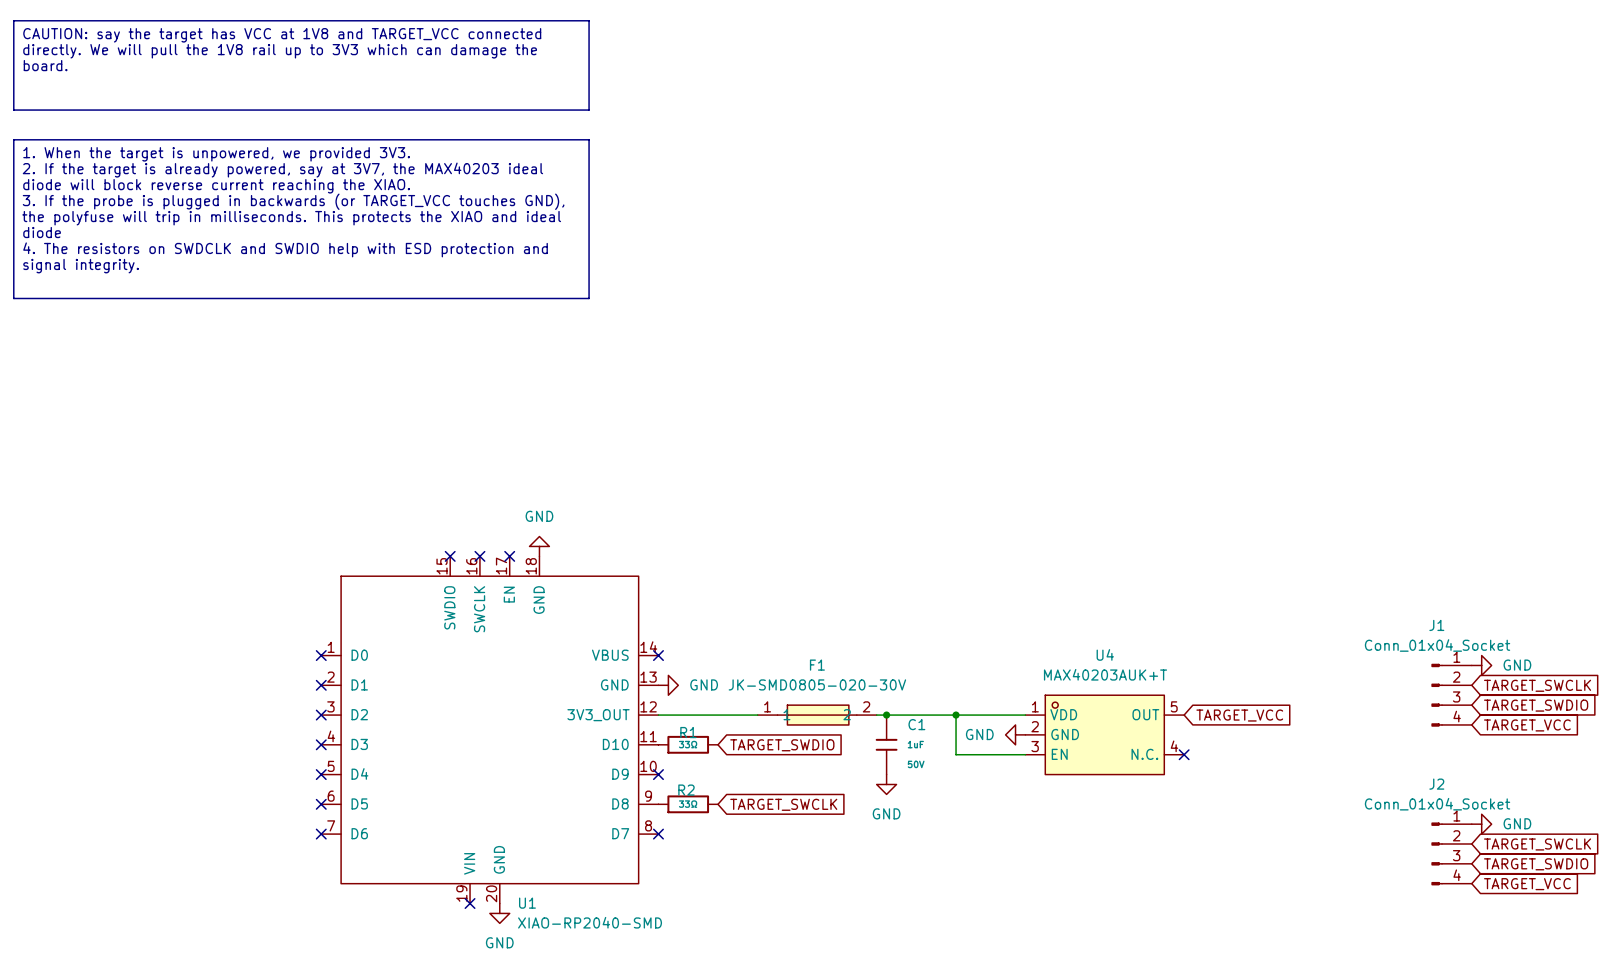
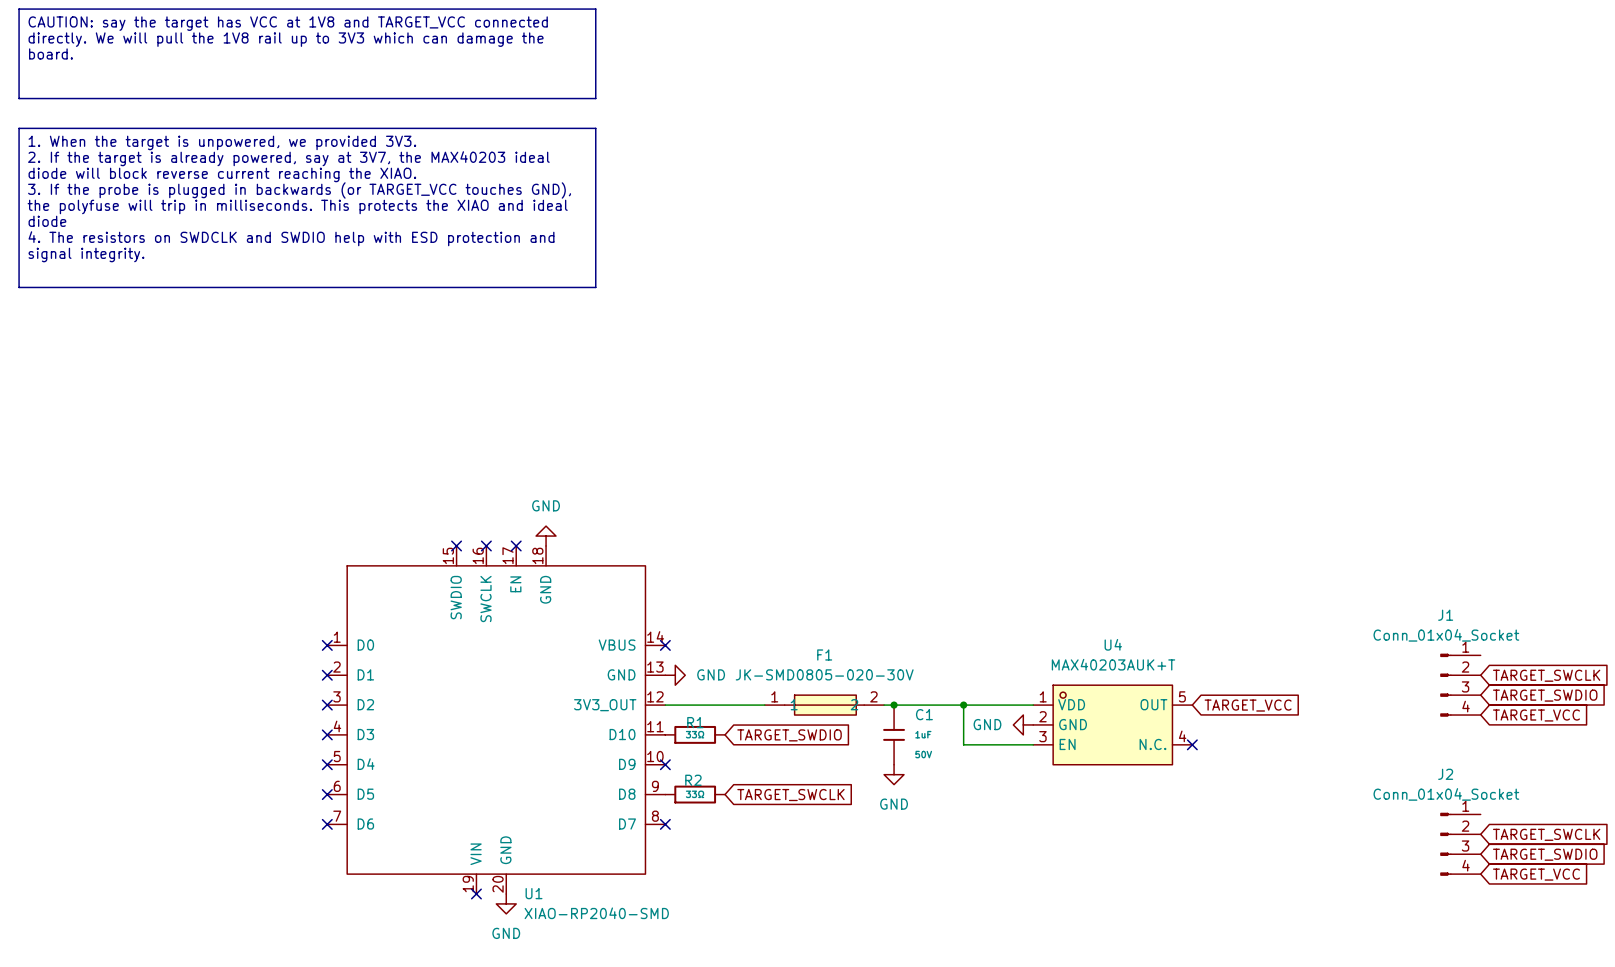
power symbol: GND (1481, 665) -> none
power symbol: GND (1481, 824) -> none

